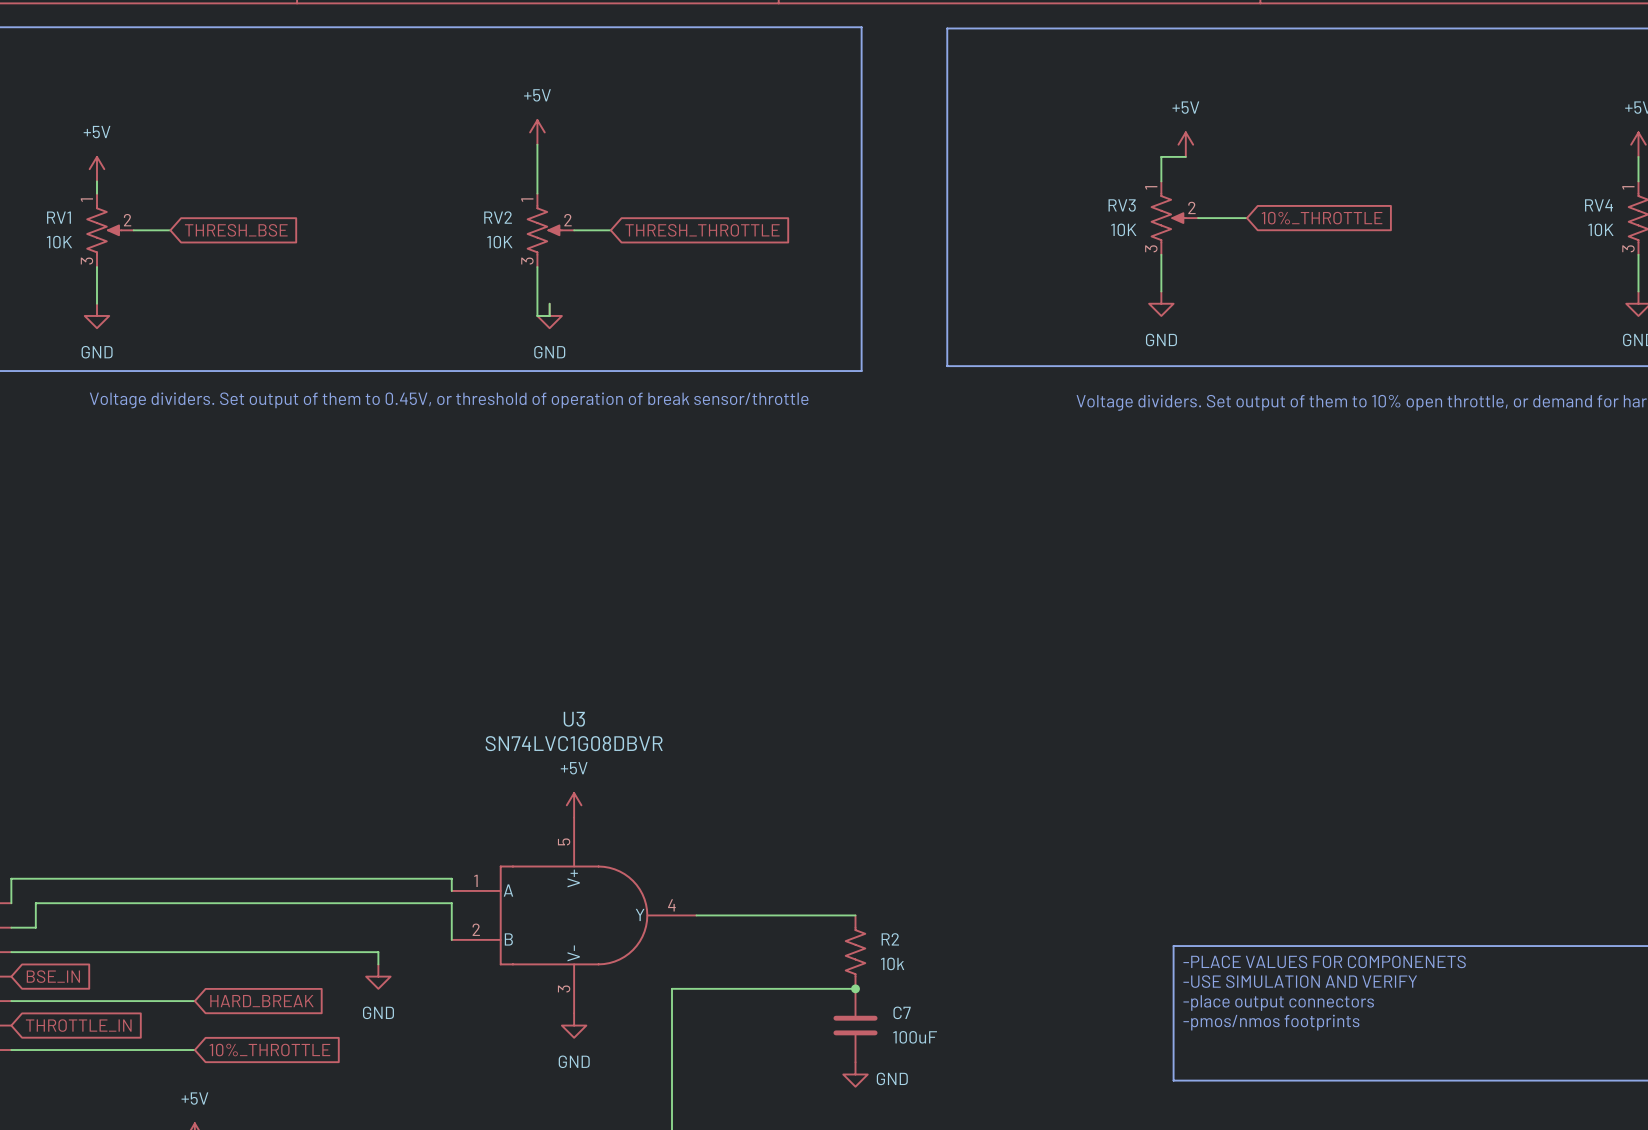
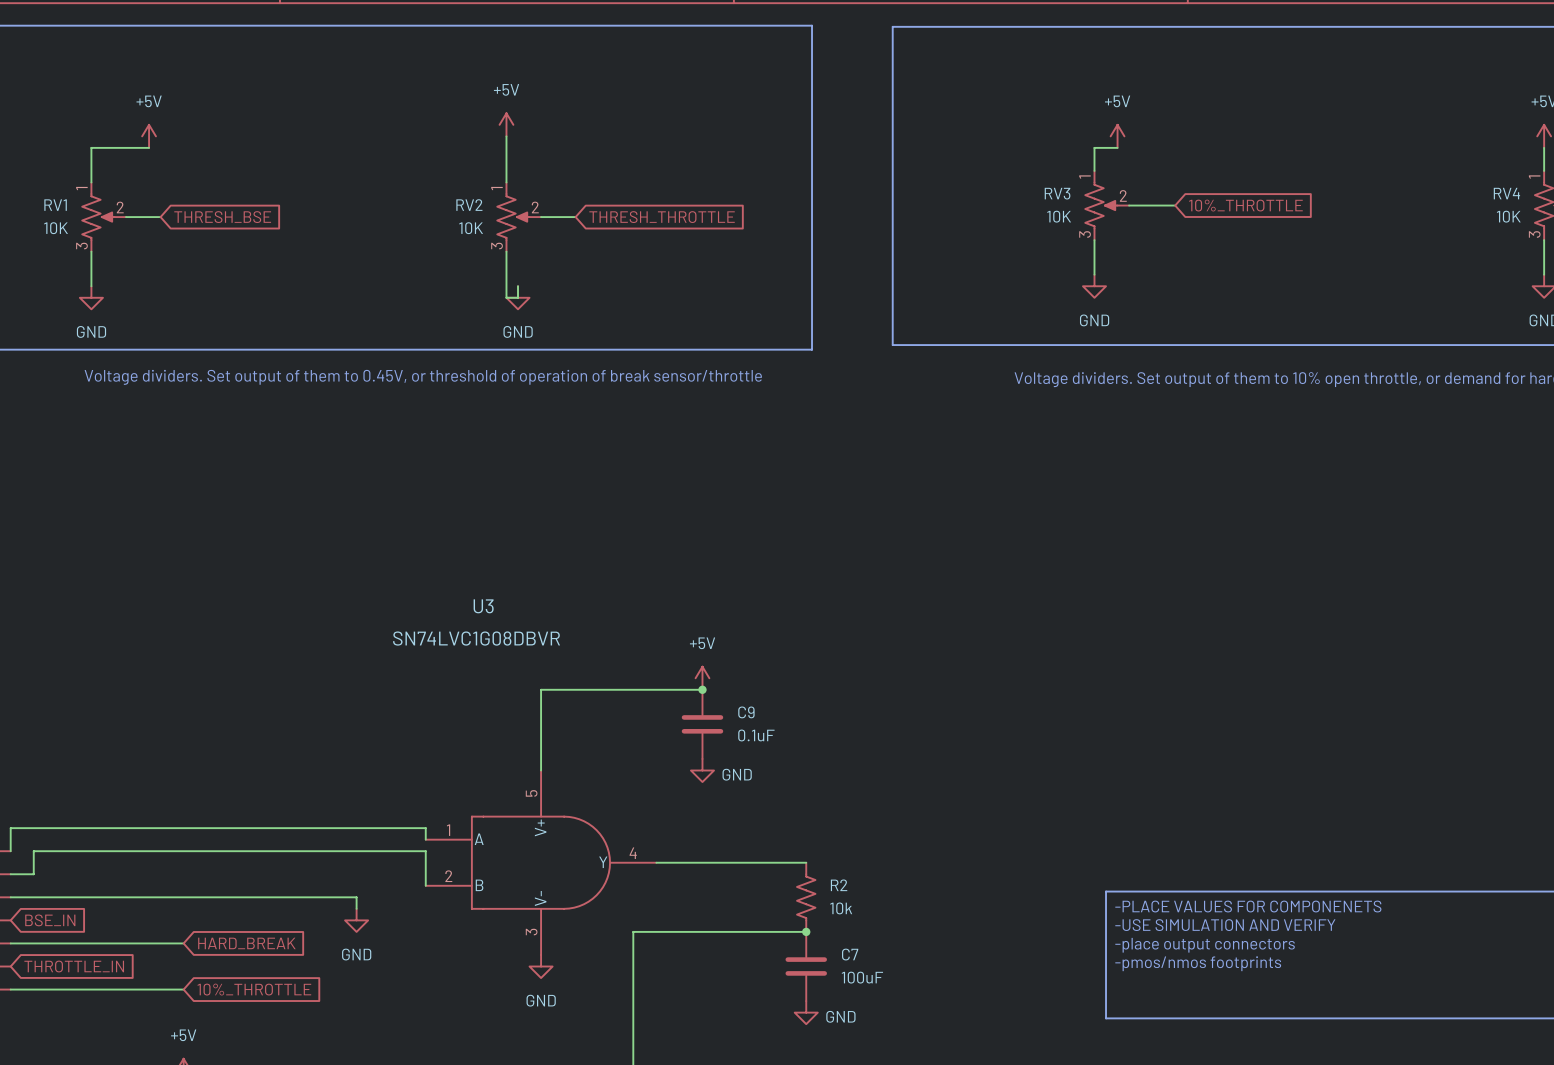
wire: none -> (149, 147) (91, 147) (91, 170)
power symbol position: +5V (96, 169) -> +5V (149, 136)
U3 name position: U3 (574, 719) -> U3 (483, 606)
wire: none -> (702, 689) (541, 689) (541, 770)
junction: none -> (702, 689)
U3 value position: SN74LVC1G08DBVR (574, 743) -> SN74LVC1G08DBVR (476, 638)
C9: none -> 0.1uF (702, 724)
power symbol position: +5V (574, 805) -> +5V (702, 678)
power symbol: none -> GND (702, 770)

